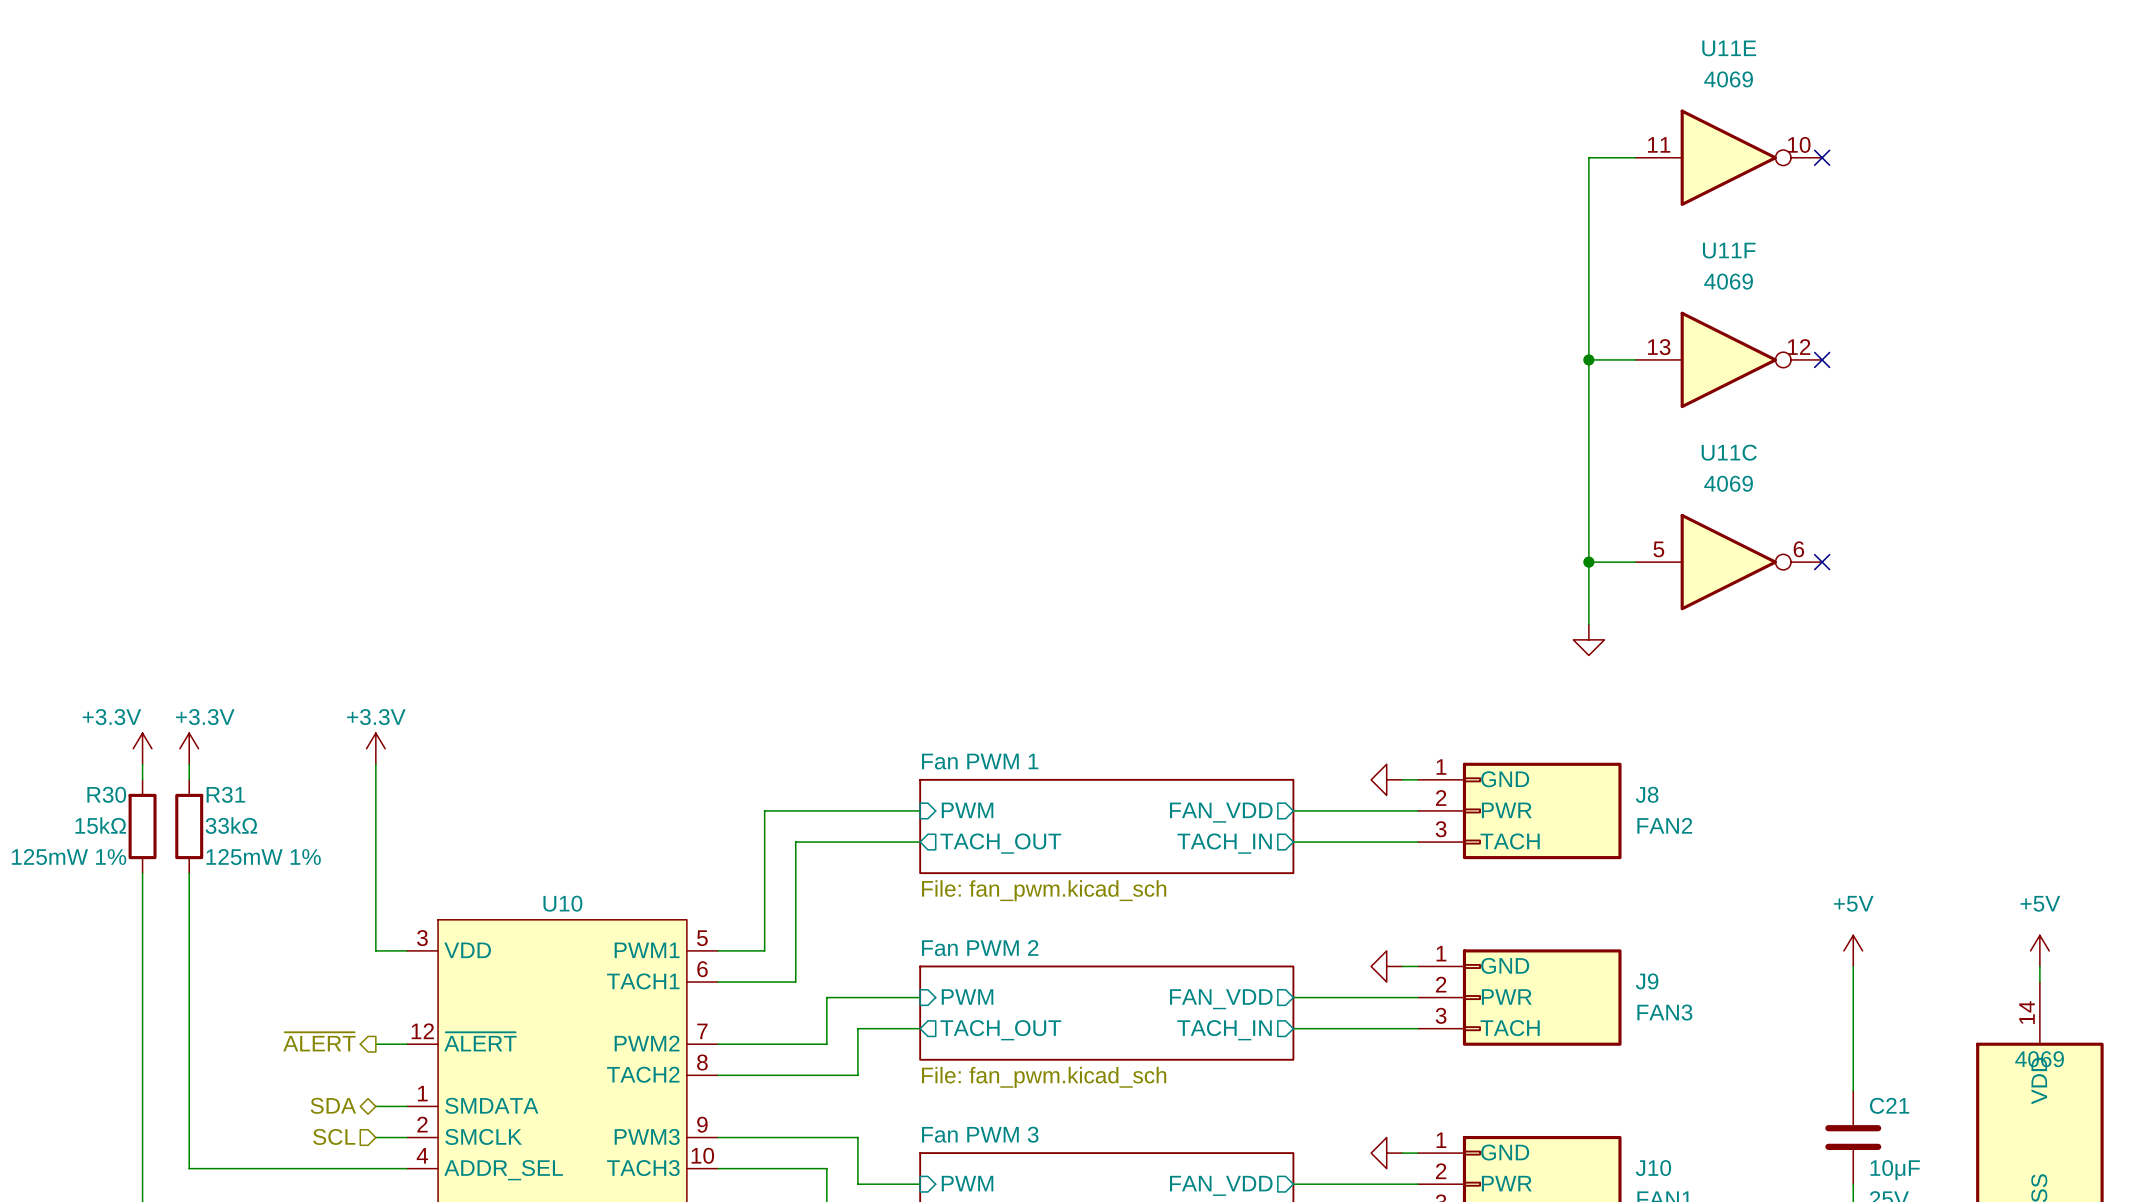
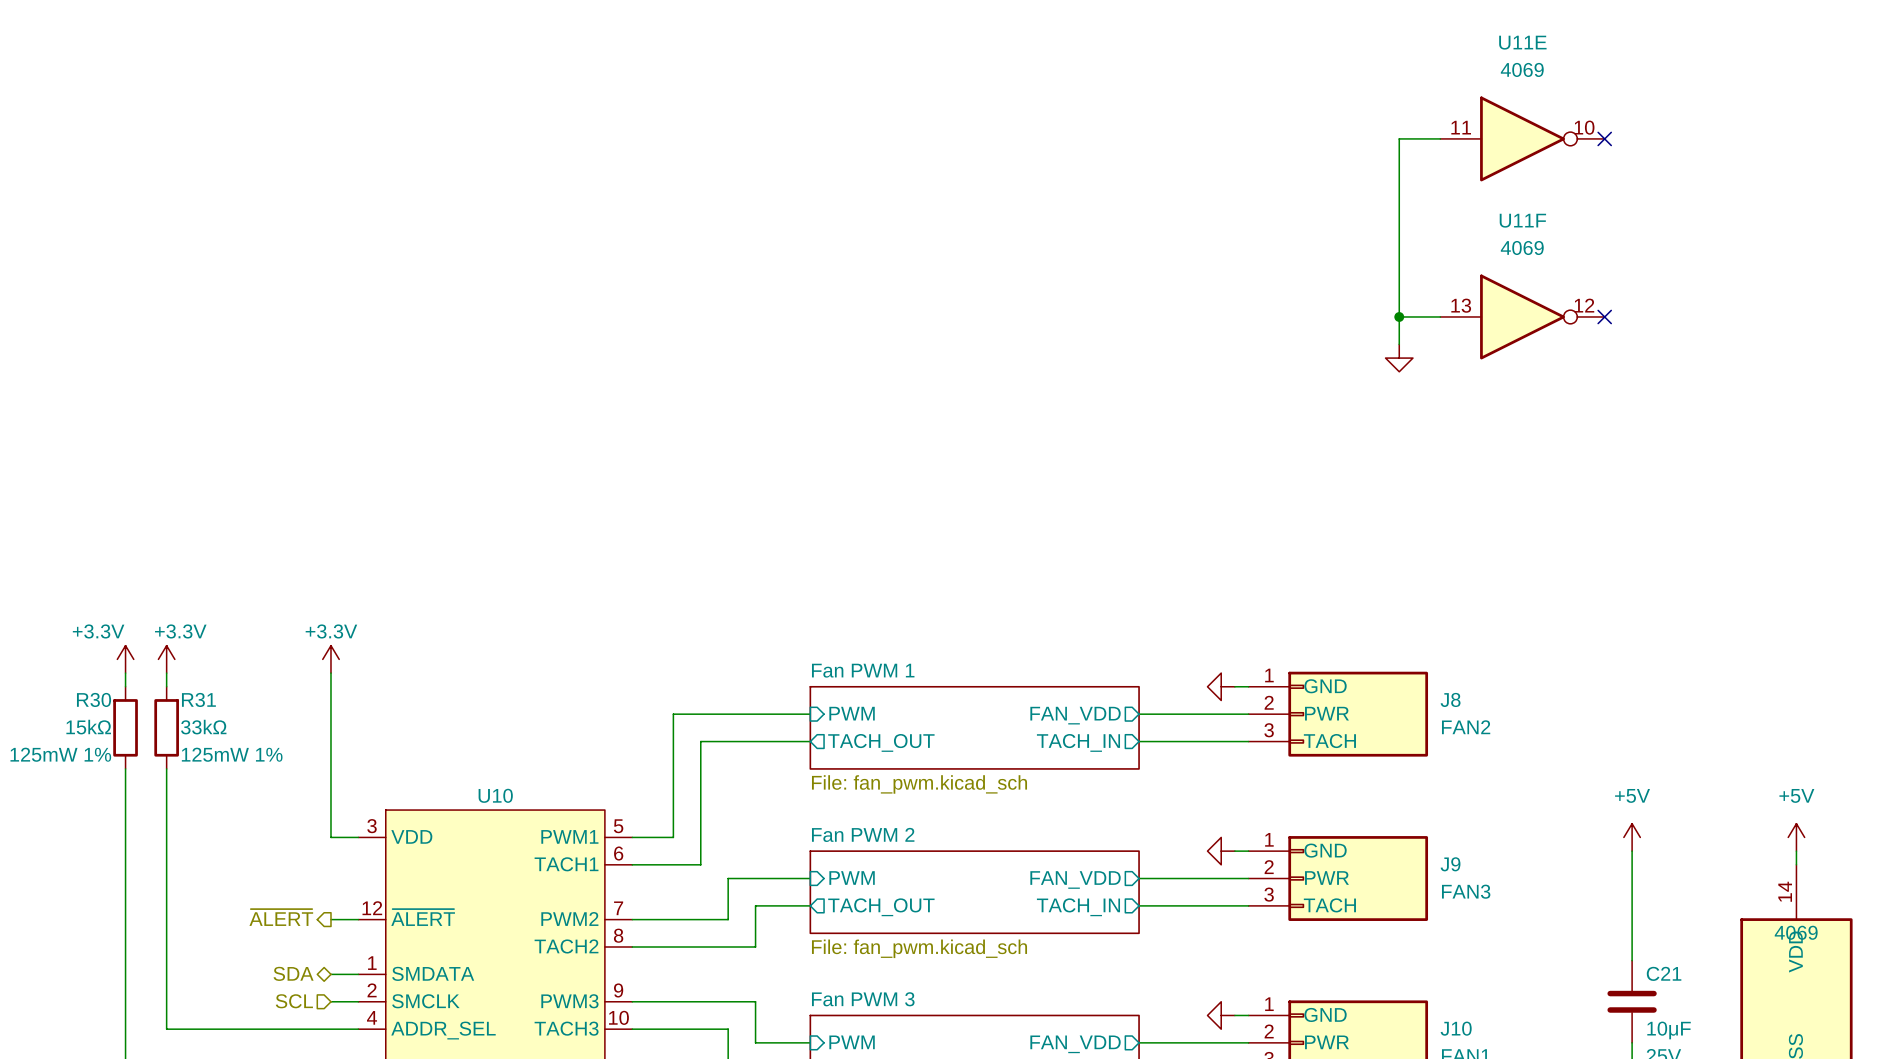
wire: (1588, 391) (1588, 624) -> none
wire: (1588, 562) (1635, 562) -> none
junction: (1588, 562) -> none
U11C: 4069 (1728, 562) -> none
no-connect mark: (1822, 562) -> none
power symbol position: (1588, 639) -> (1399, 358)

